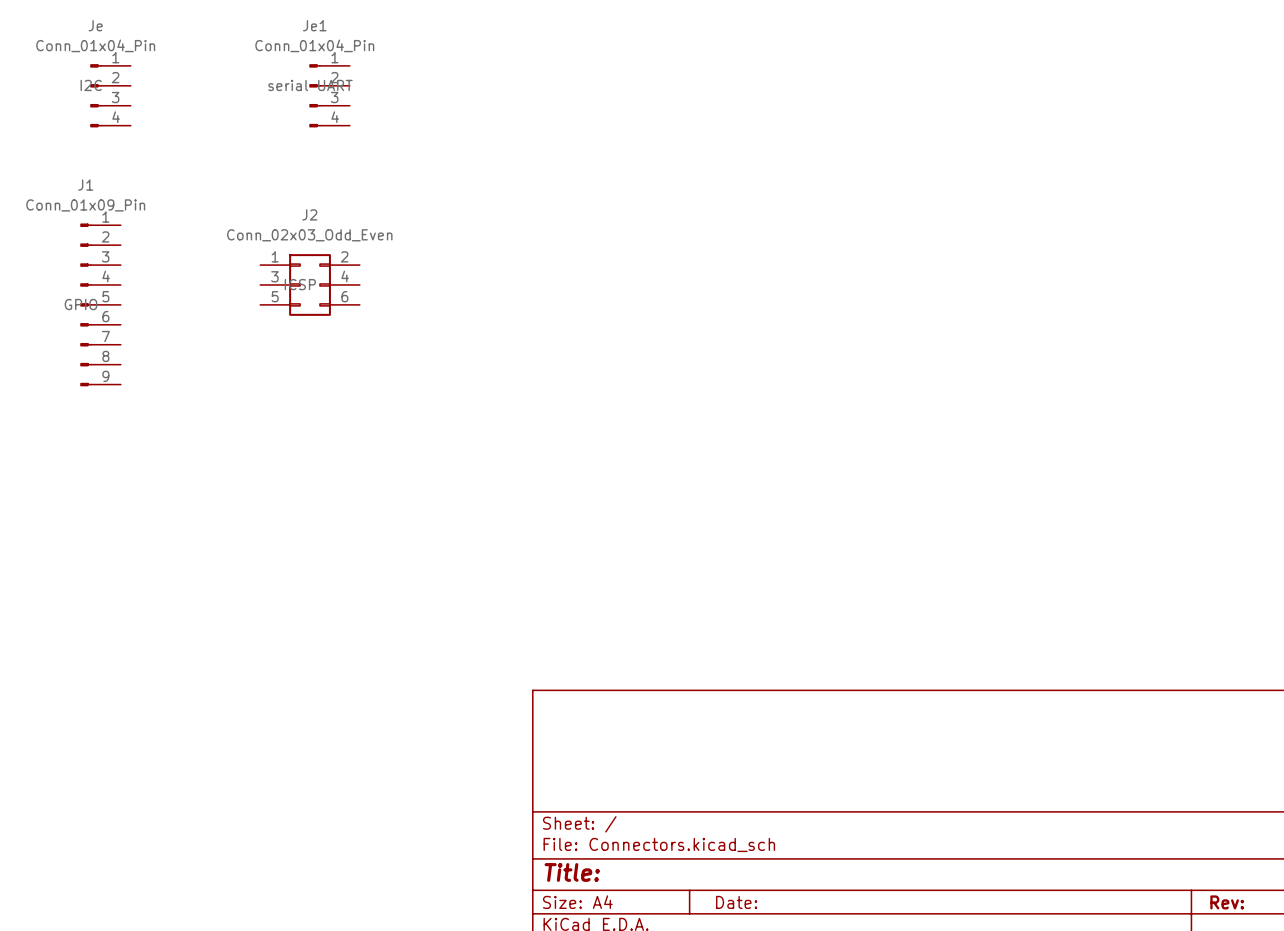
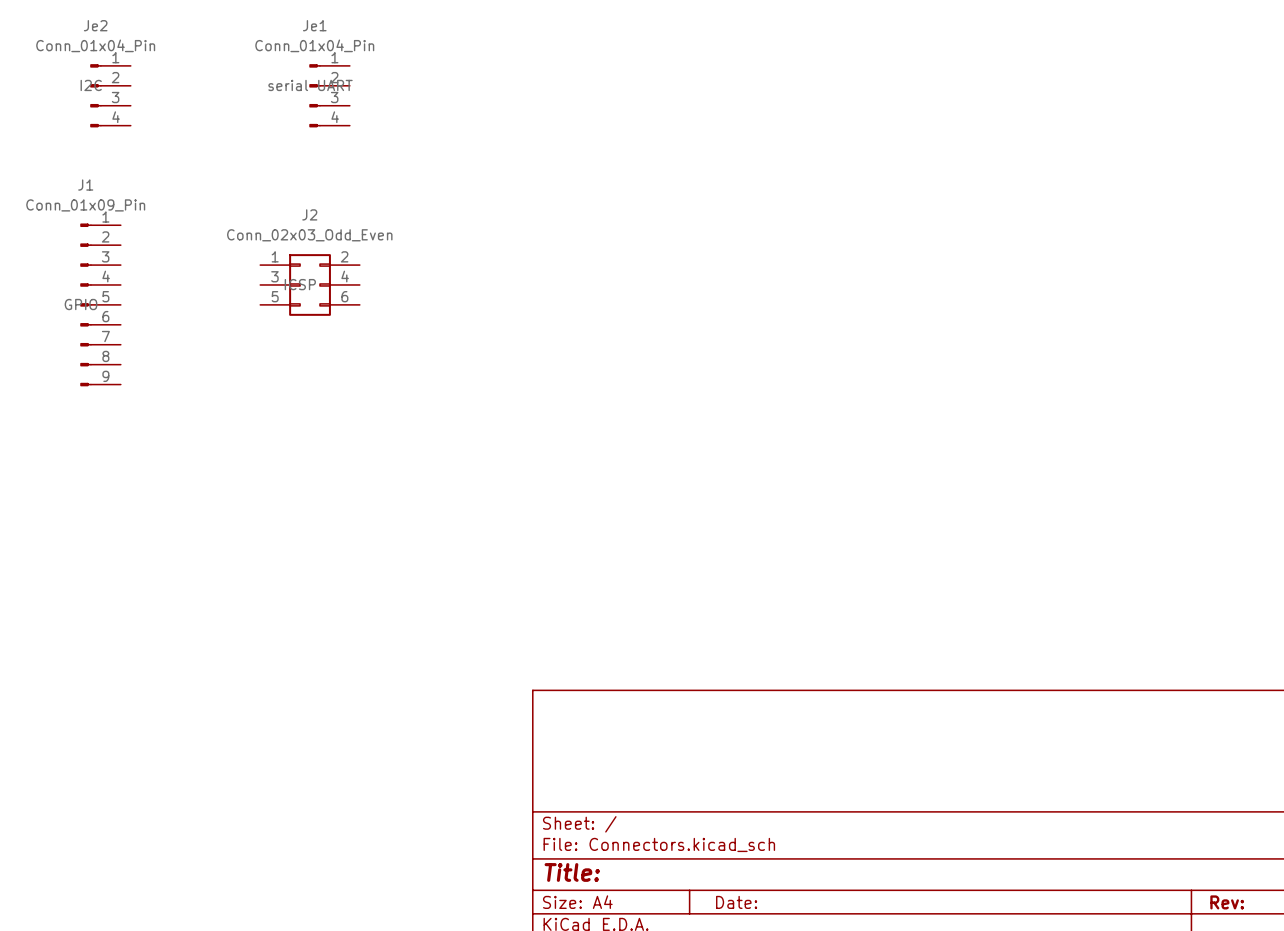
Je name: Je (95, 25) -> Je2 (95, 25)

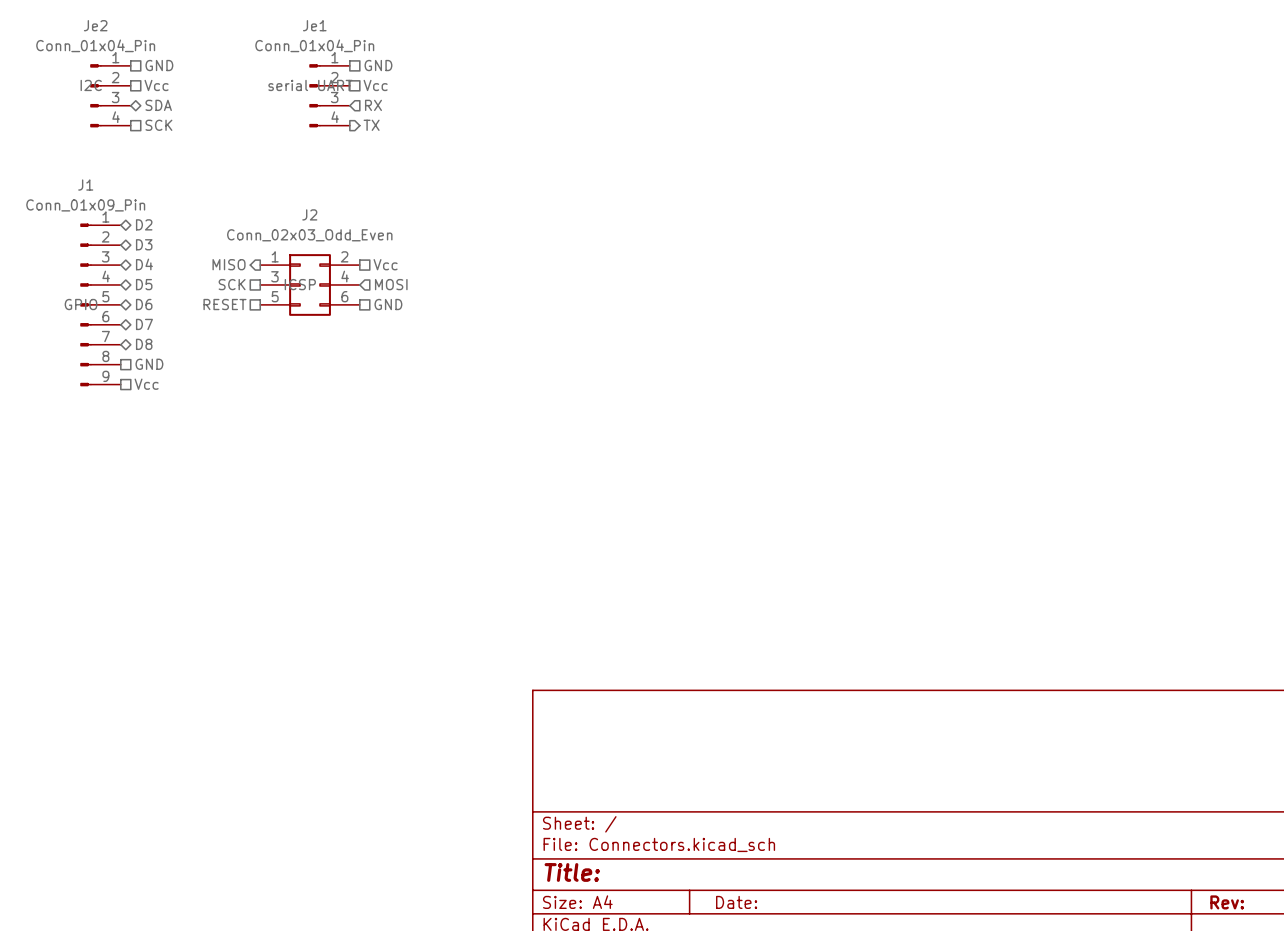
hierarchical label: none -> GND (159, 65)
hierarchical label: none -> GND (378, 65)
hierarchical label: none -> Vcc (156, 85)
hierarchical label: none -> Vcc (375, 85)
hierarchical label: none -> SDA (158, 105)
hierarchical label: none -> RX (373, 105)
hierarchical label: none -> SCK (158, 125)
hierarchical label: none -> TX (371, 125)
hierarchical label: none -> D2 (144, 224)
hierarchical label: none -> D3 (144, 244)
hierarchical label: none -> D4 (144, 264)
hierarchical label: none -> MISO (229, 264)
hierarchical label: none -> Vcc (385, 264)
hierarchical label: none -> D5 (144, 284)
hierarchical label: none -> SCK (232, 284)
hierarchical label: none -> MOSI (391, 284)
hierarchical label: none -> D6 (144, 304)
hierarchical label: none -> RESET (224, 304)
hierarchical label: none -> GND (388, 304)
hierarchical label: none -> D7 (144, 324)
hierarchical label: none -> D8 (144, 344)
hierarchical label: none -> GND (149, 364)
hierarchical label: none -> Vcc (146, 384)

